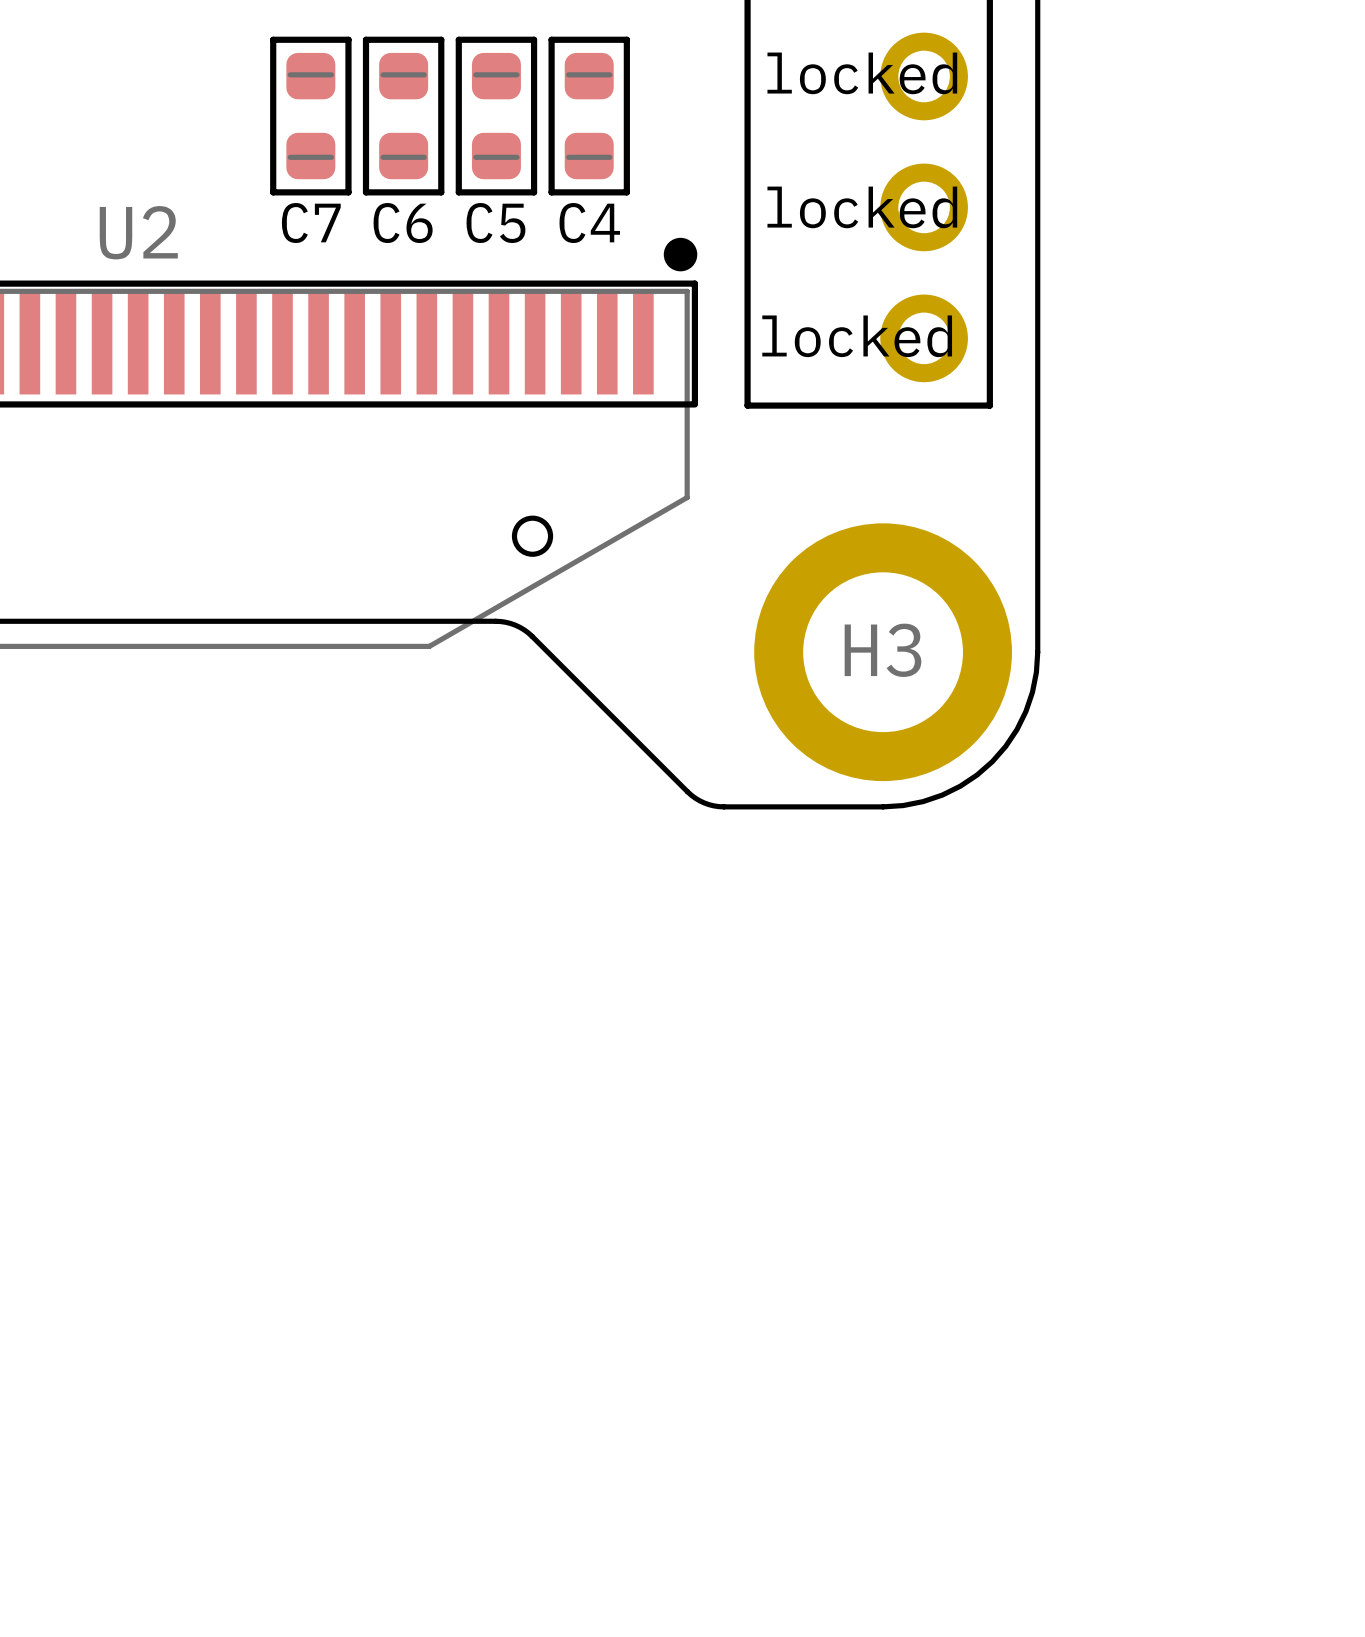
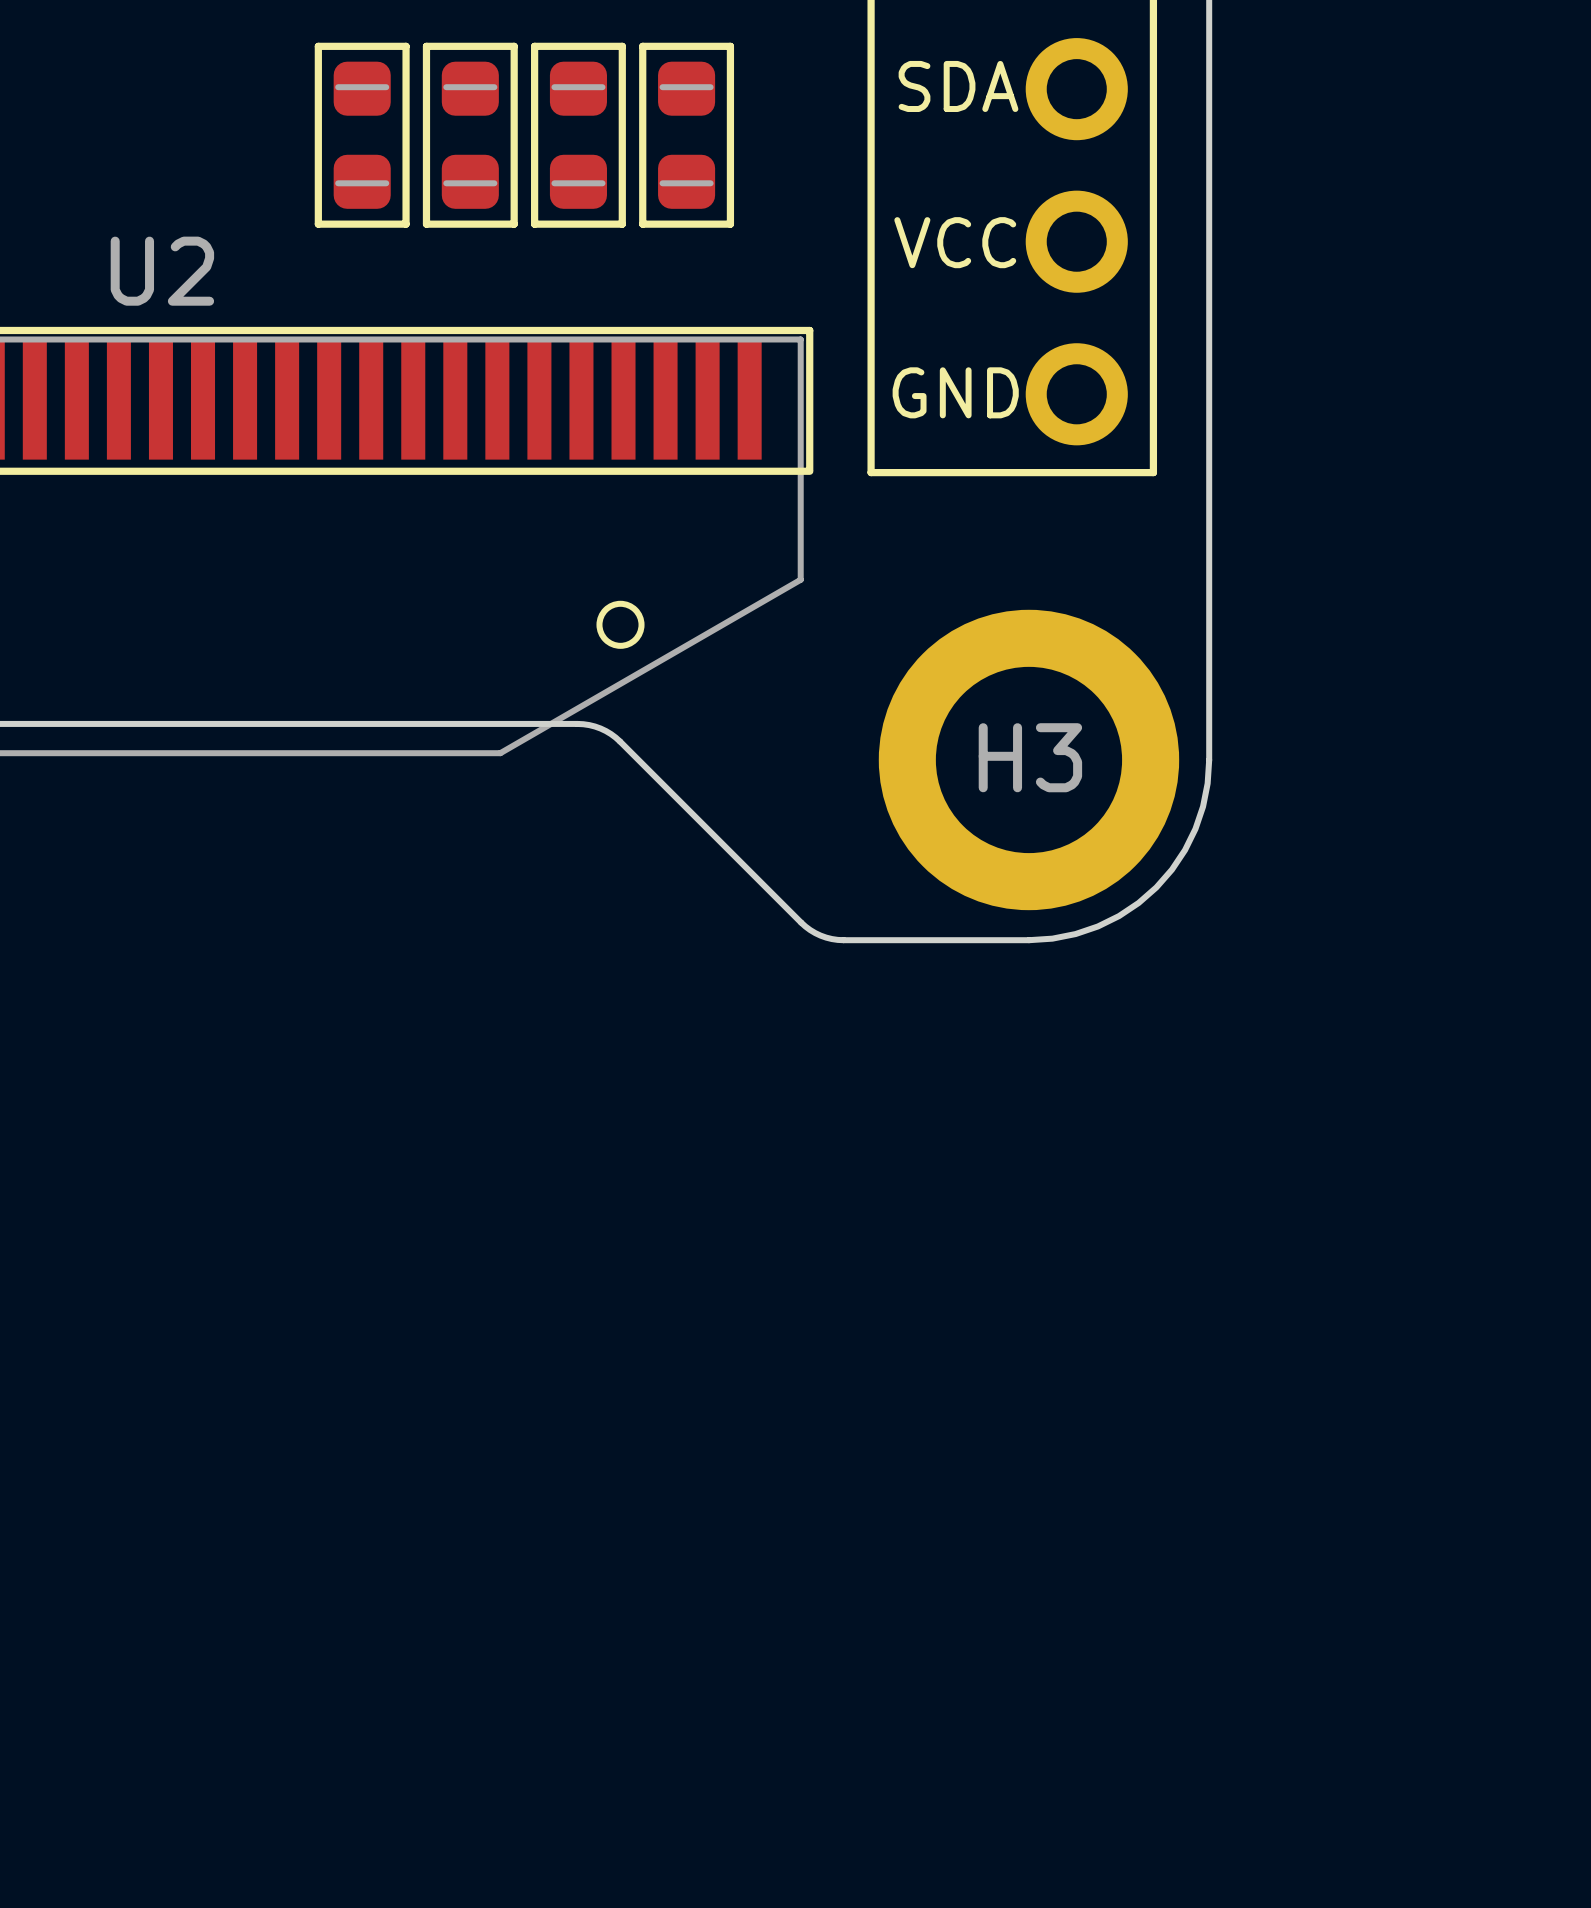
text: locked (862, 73) -> SDA (958, 86)
text: locked (862, 207) -> VCC (955, 242)
C7 name: C7 (311, 223) -> none
C6 name: C6 (403, 223) -> none
C5 name: C5 (495, 223) -> none
C4 name: C4 (589, 223) -> none
drawing: [663, 237, 698, 272] -> none
text: locked (857, 336) -> GND (955, 392)

